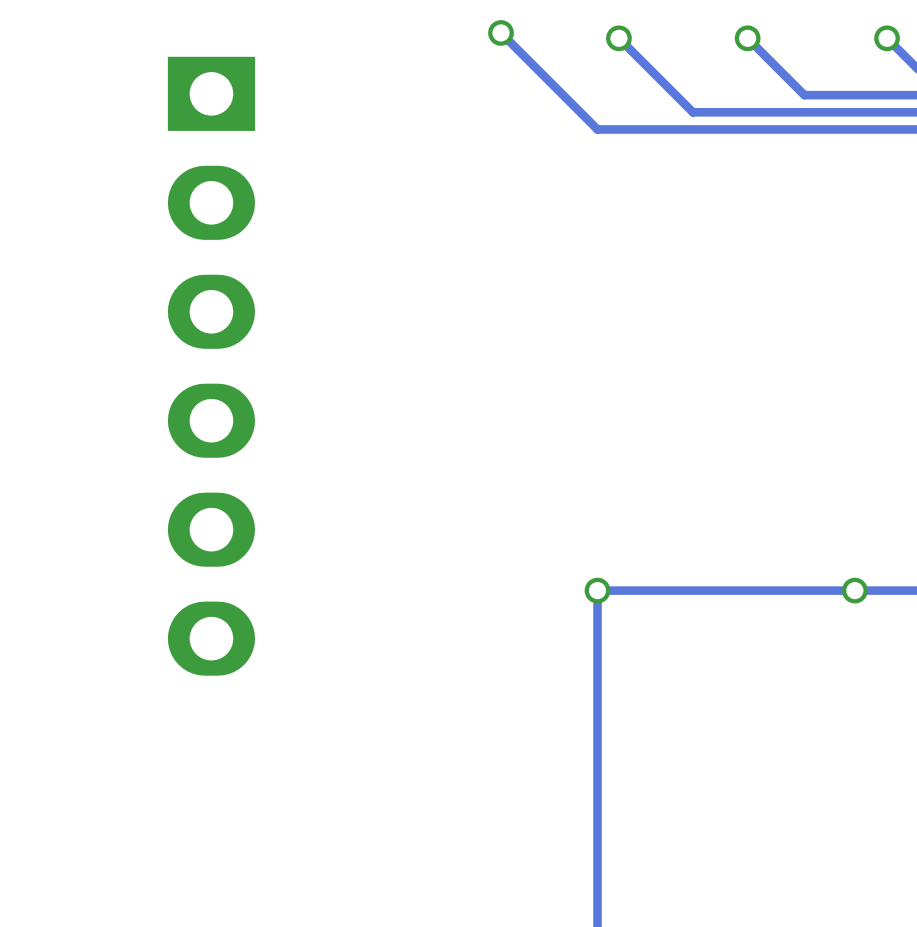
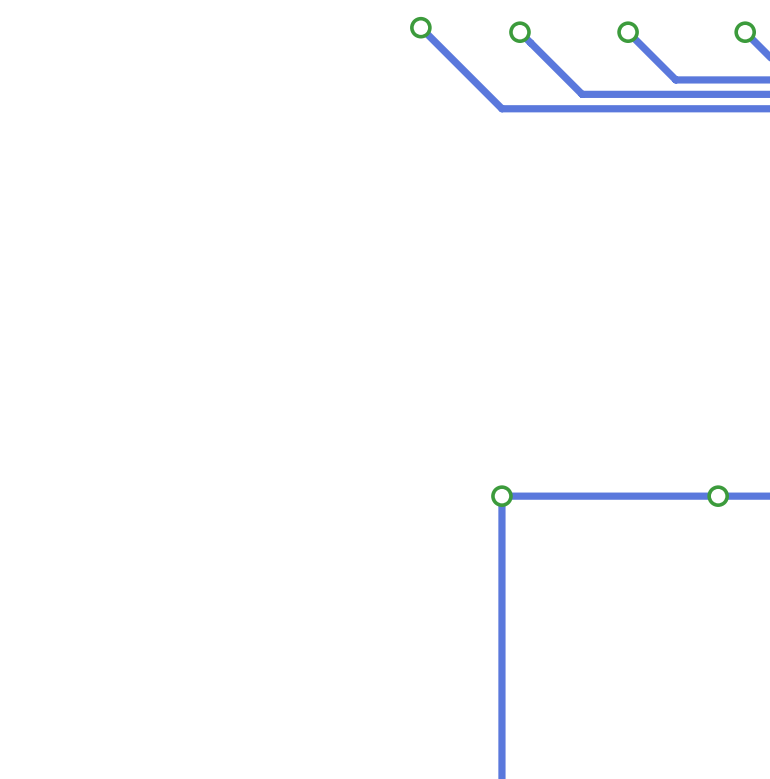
part: (211, 366) -> none

